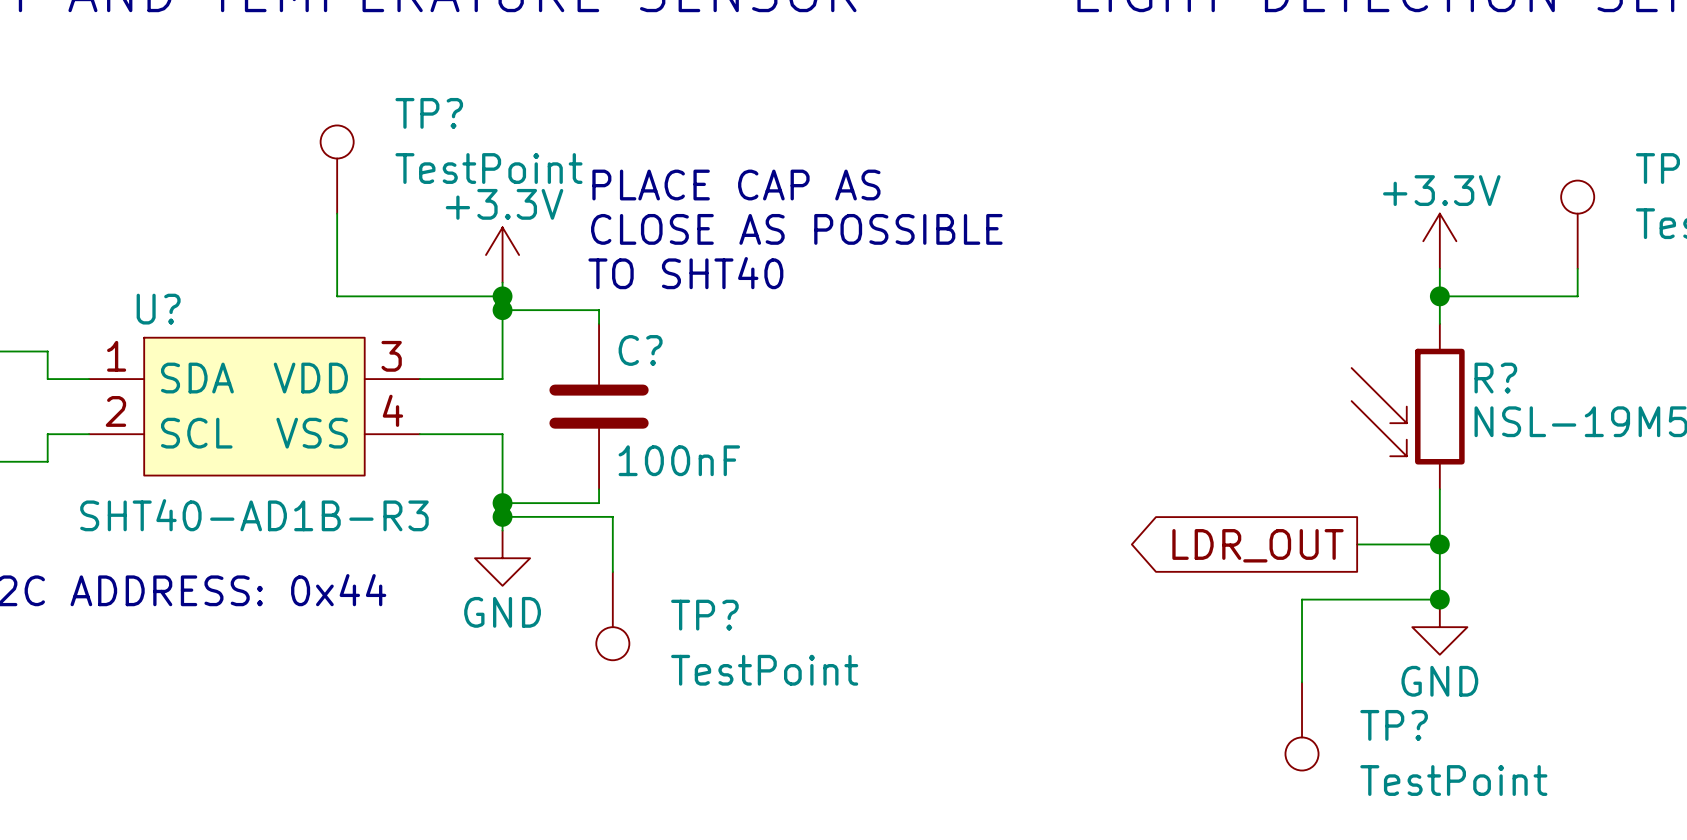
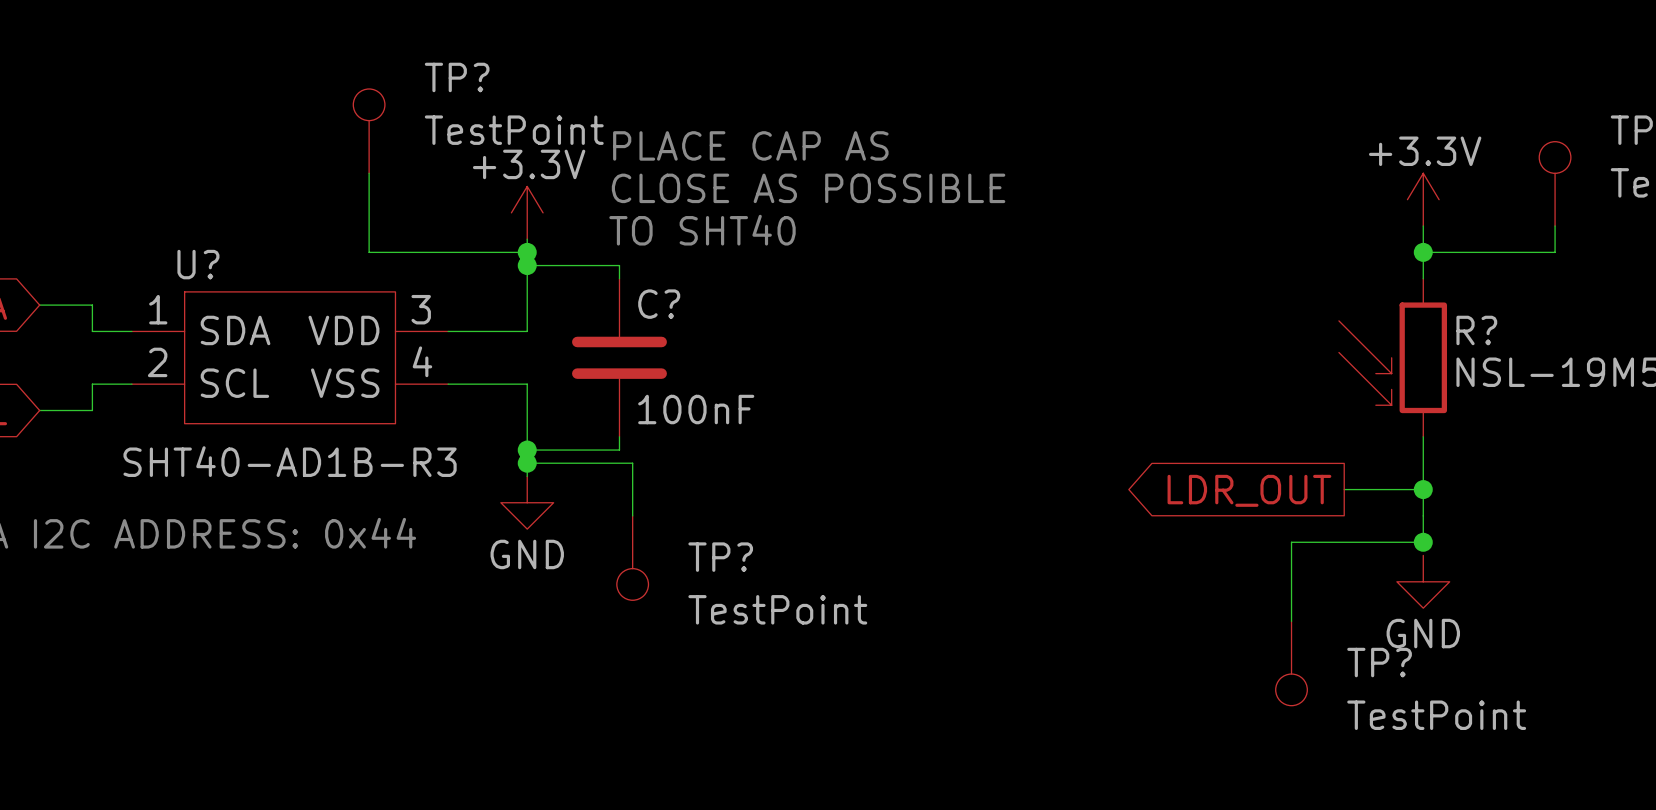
power symbol position: GND (1439, 627) -> GND (1423, 581)

